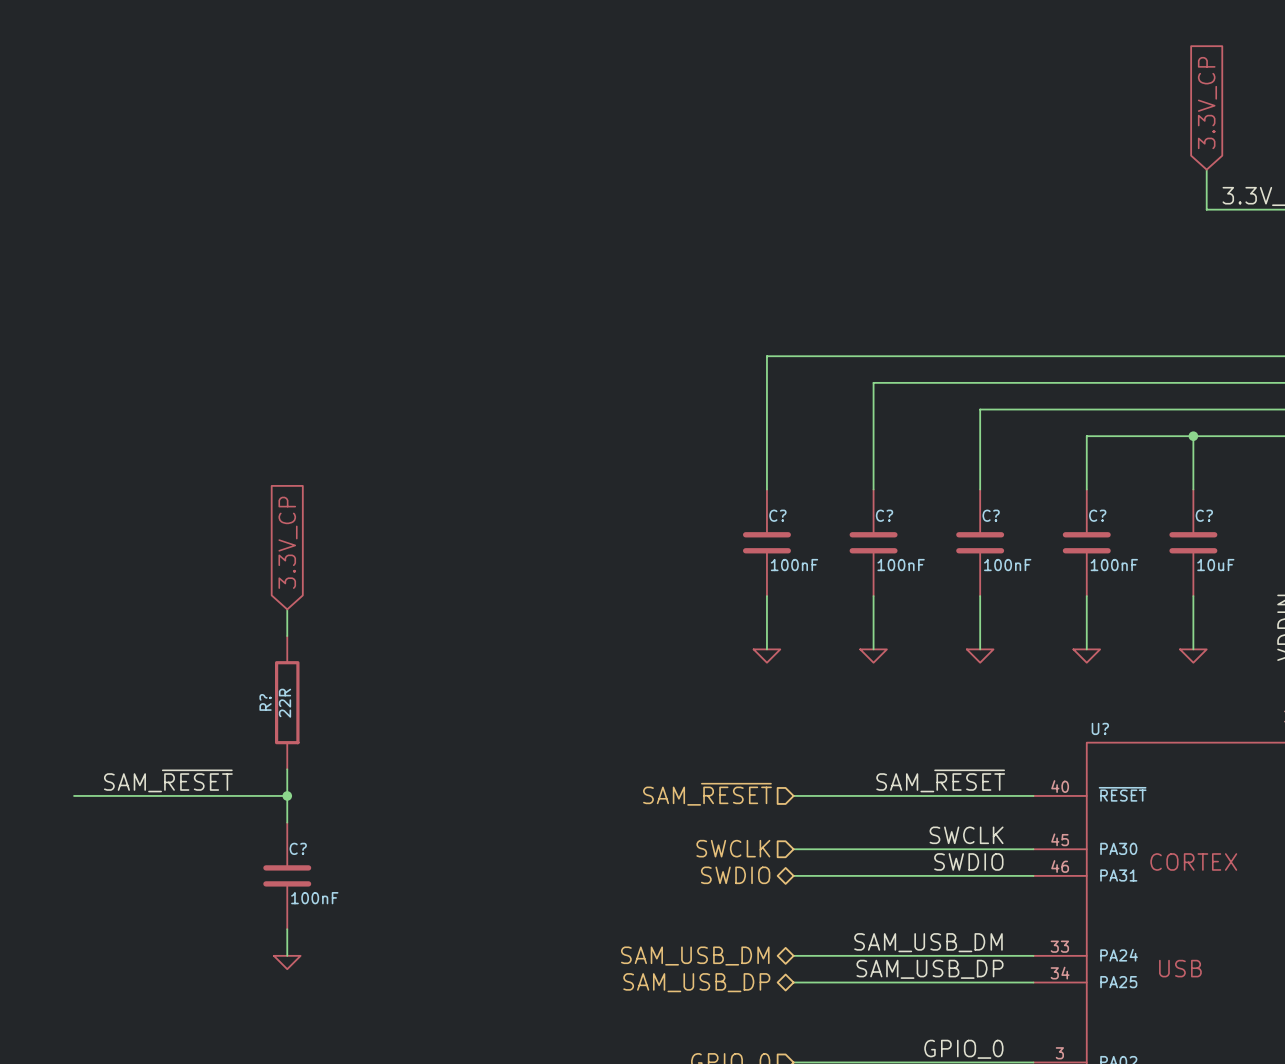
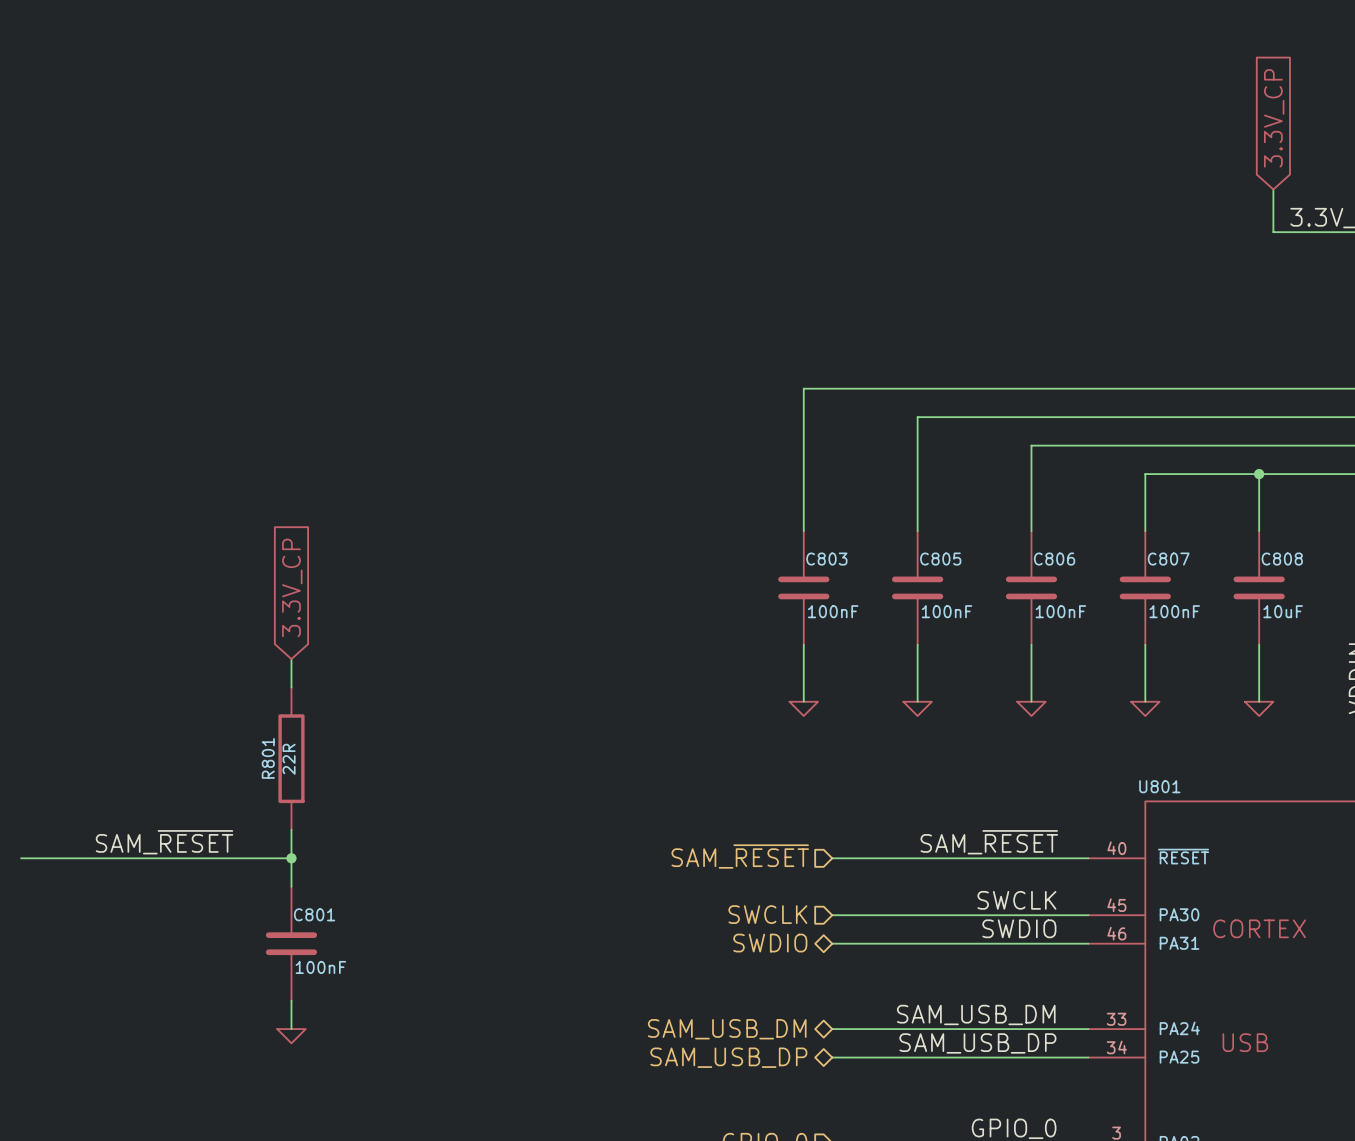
C? name: C? (777, 515) -> C803 (826, 559)
C? name: C? (884, 515) -> C805 (940, 559)
C? name: C? (991, 515) -> C806 (1054, 559)
C? name: C? (1097, 515) -> C807 (1168, 559)
C? name: C? (1204, 515) -> C808 (1282, 559)
R? name: R? (265, 702) -> R801 (268, 758)
U? name: U? (1100, 728) -> U801 (1159, 786)
wire: none -> (21, 858) (63, 858)
C? name: C? (298, 848) -> C801 (314, 914)

